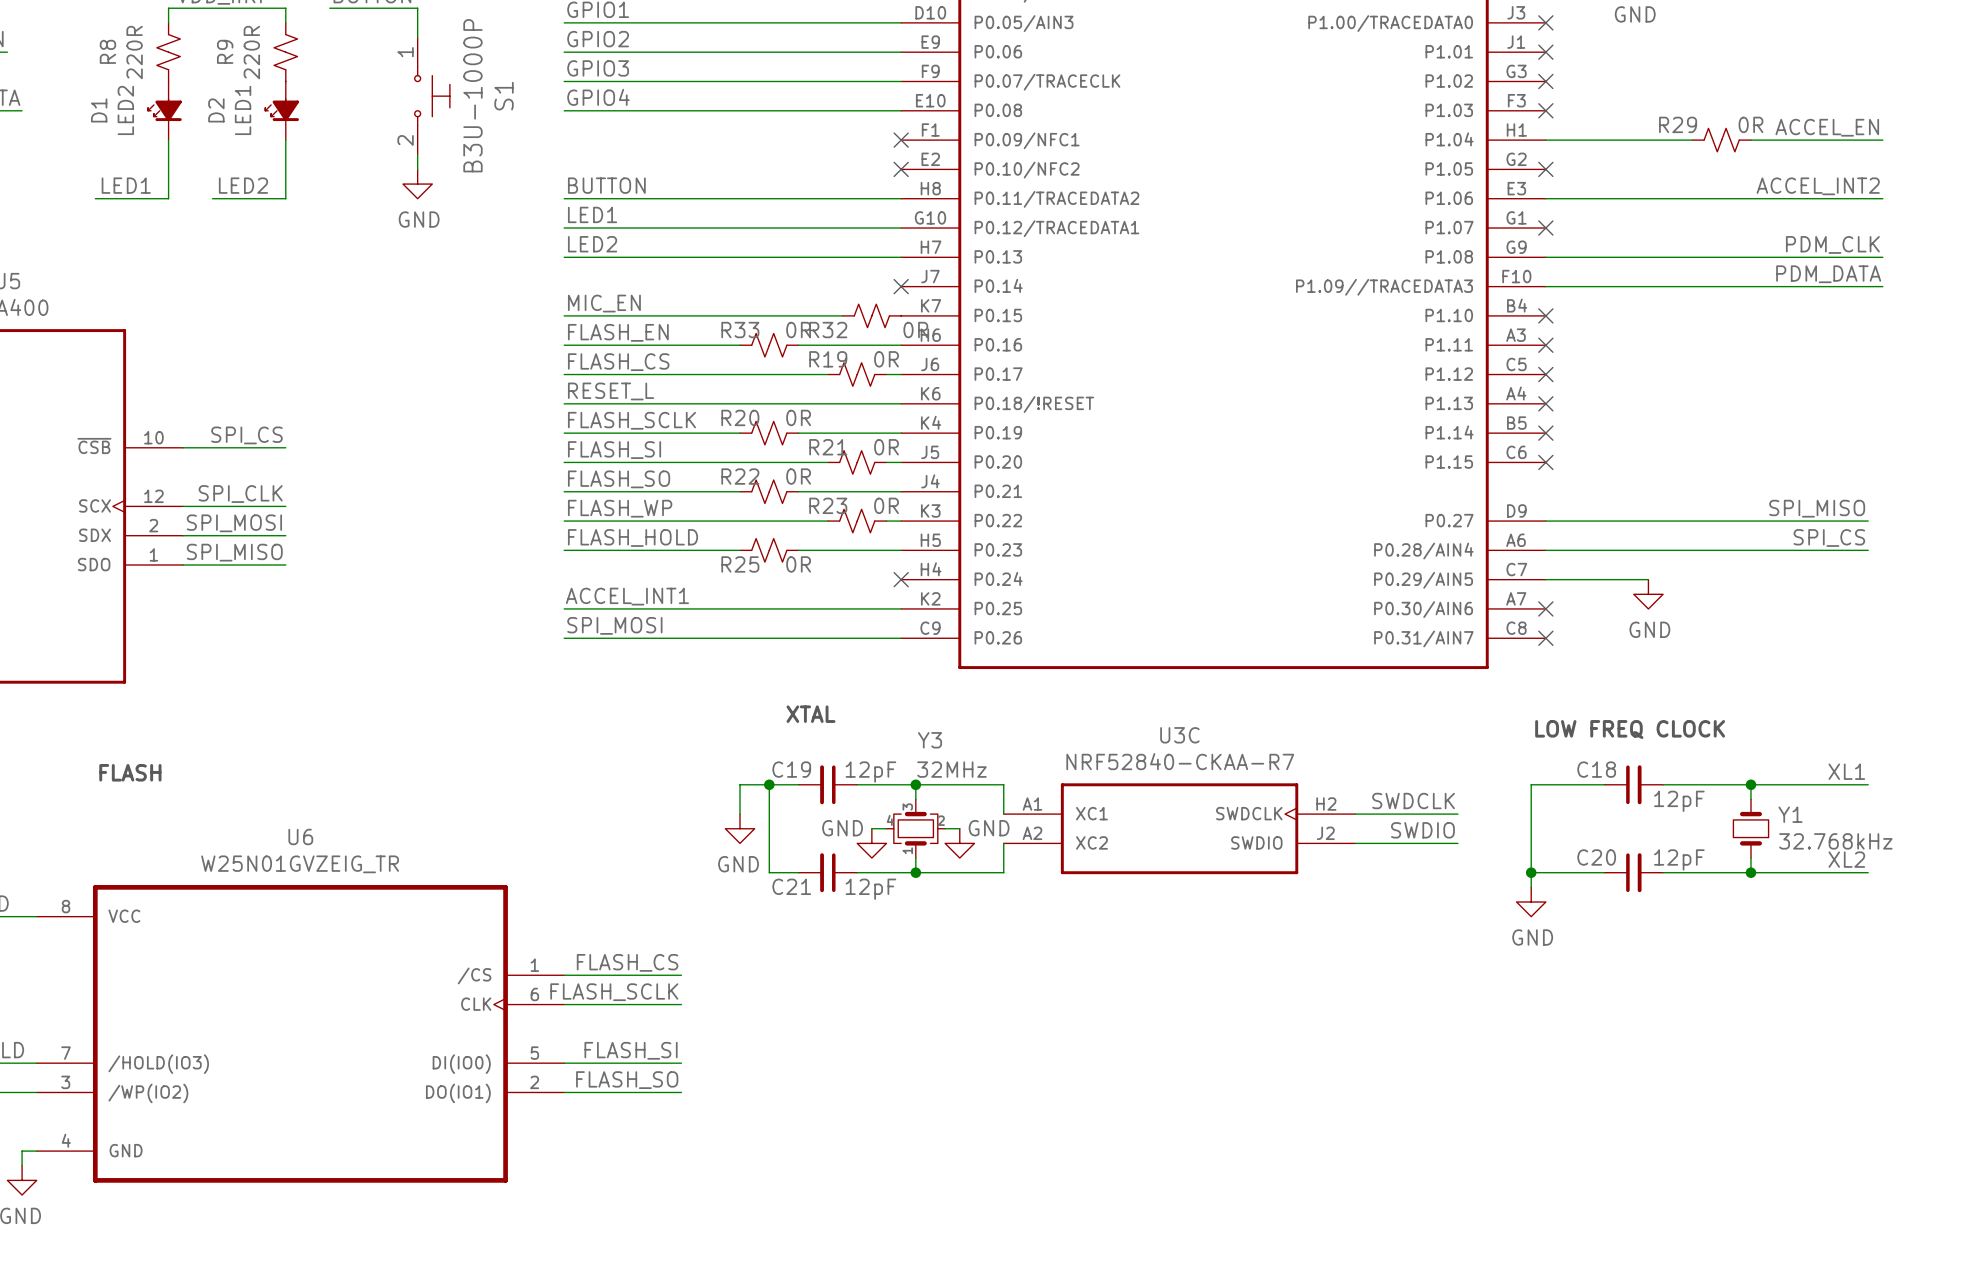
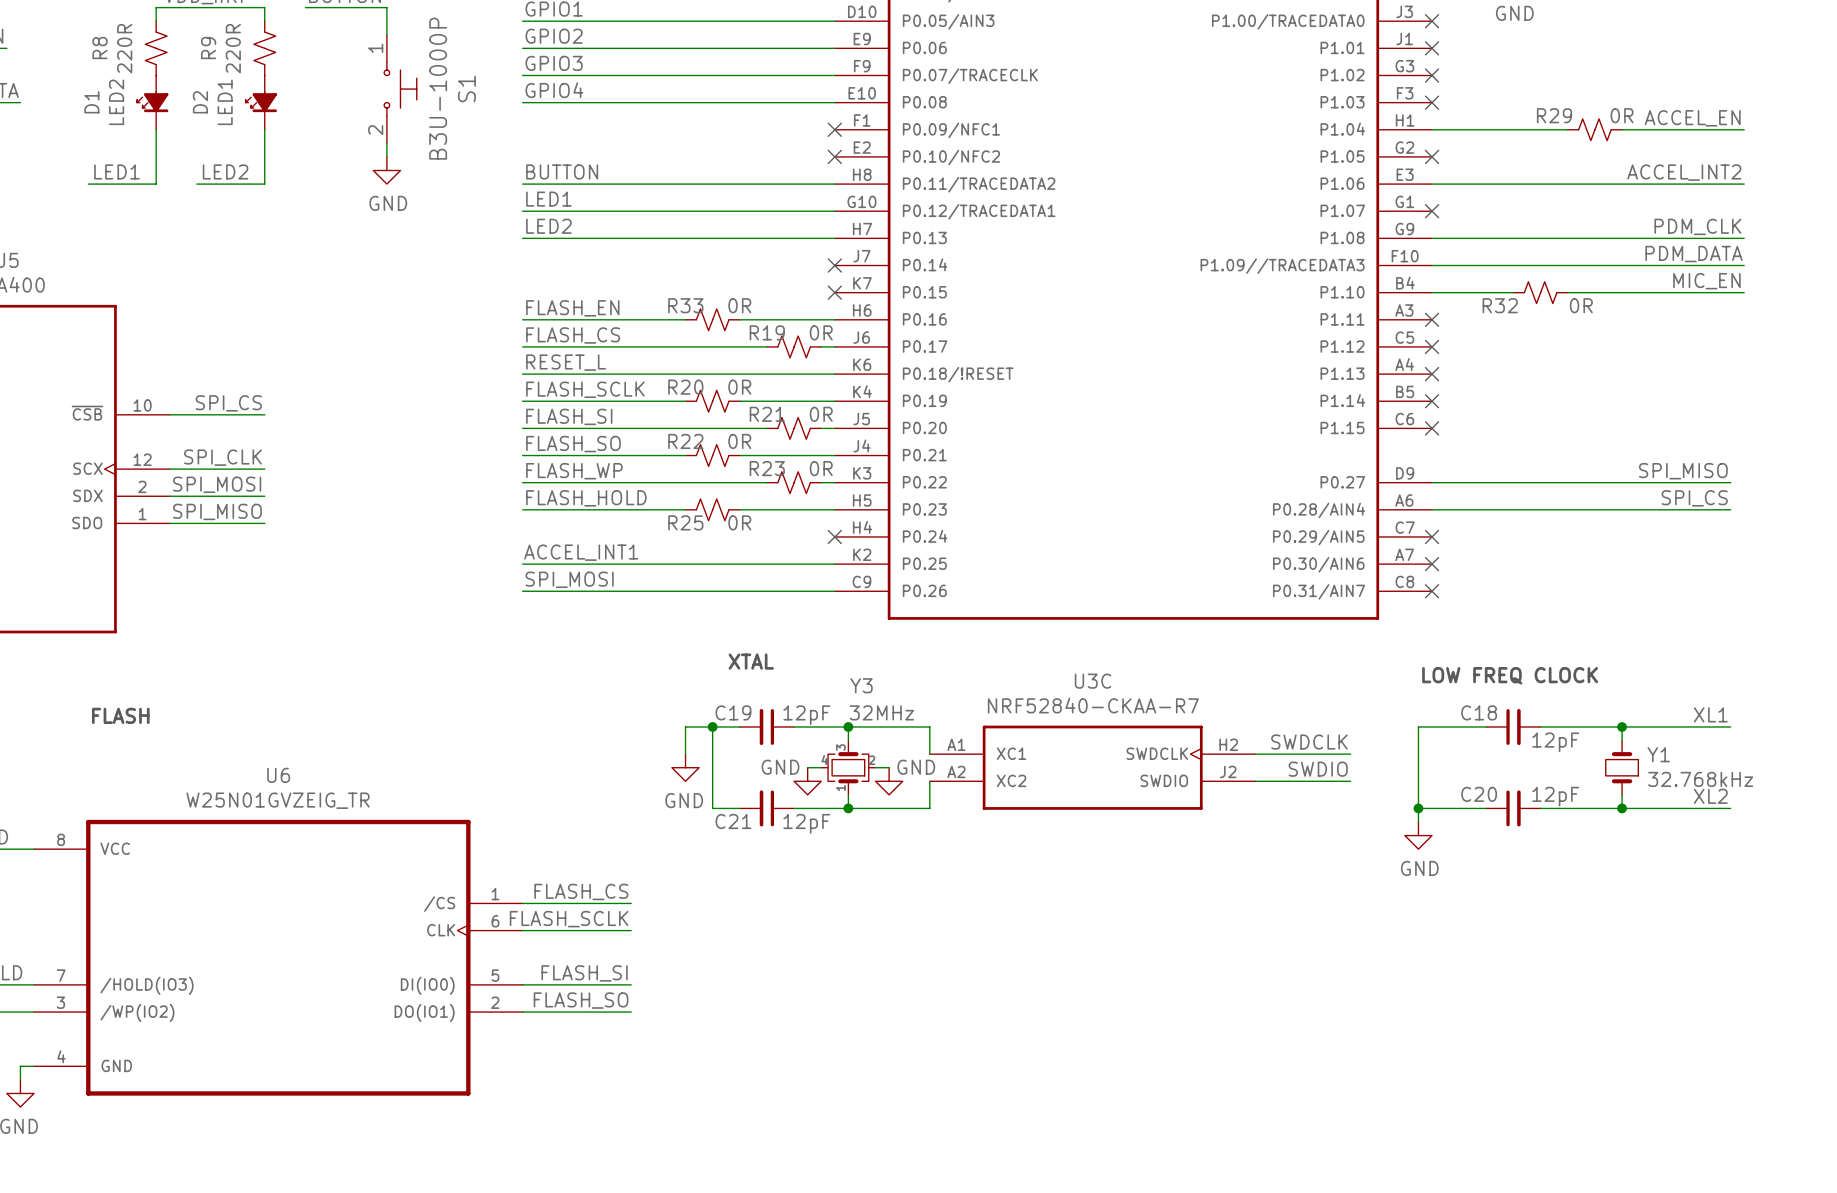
label: MIC_EN (604, 303) -> none
label: none -> MIC_EN (1706, 281)
wire: (564, 315) (842, 315) -> none
R32 position: (871, 315) -> (1540, 292)
no-connect mark: none -> (834, 292)
wire: none -> (1432, 292) (1513, 292)
no-connect mark: (1545, 315) -> none
wire: none -> (1567, 292) (1744, 292)
wire: (1545, 579) (1648, 579) -> none
no-connect mark: none -> (1432, 536)
power symbol: GND (1648, 594) -> none

